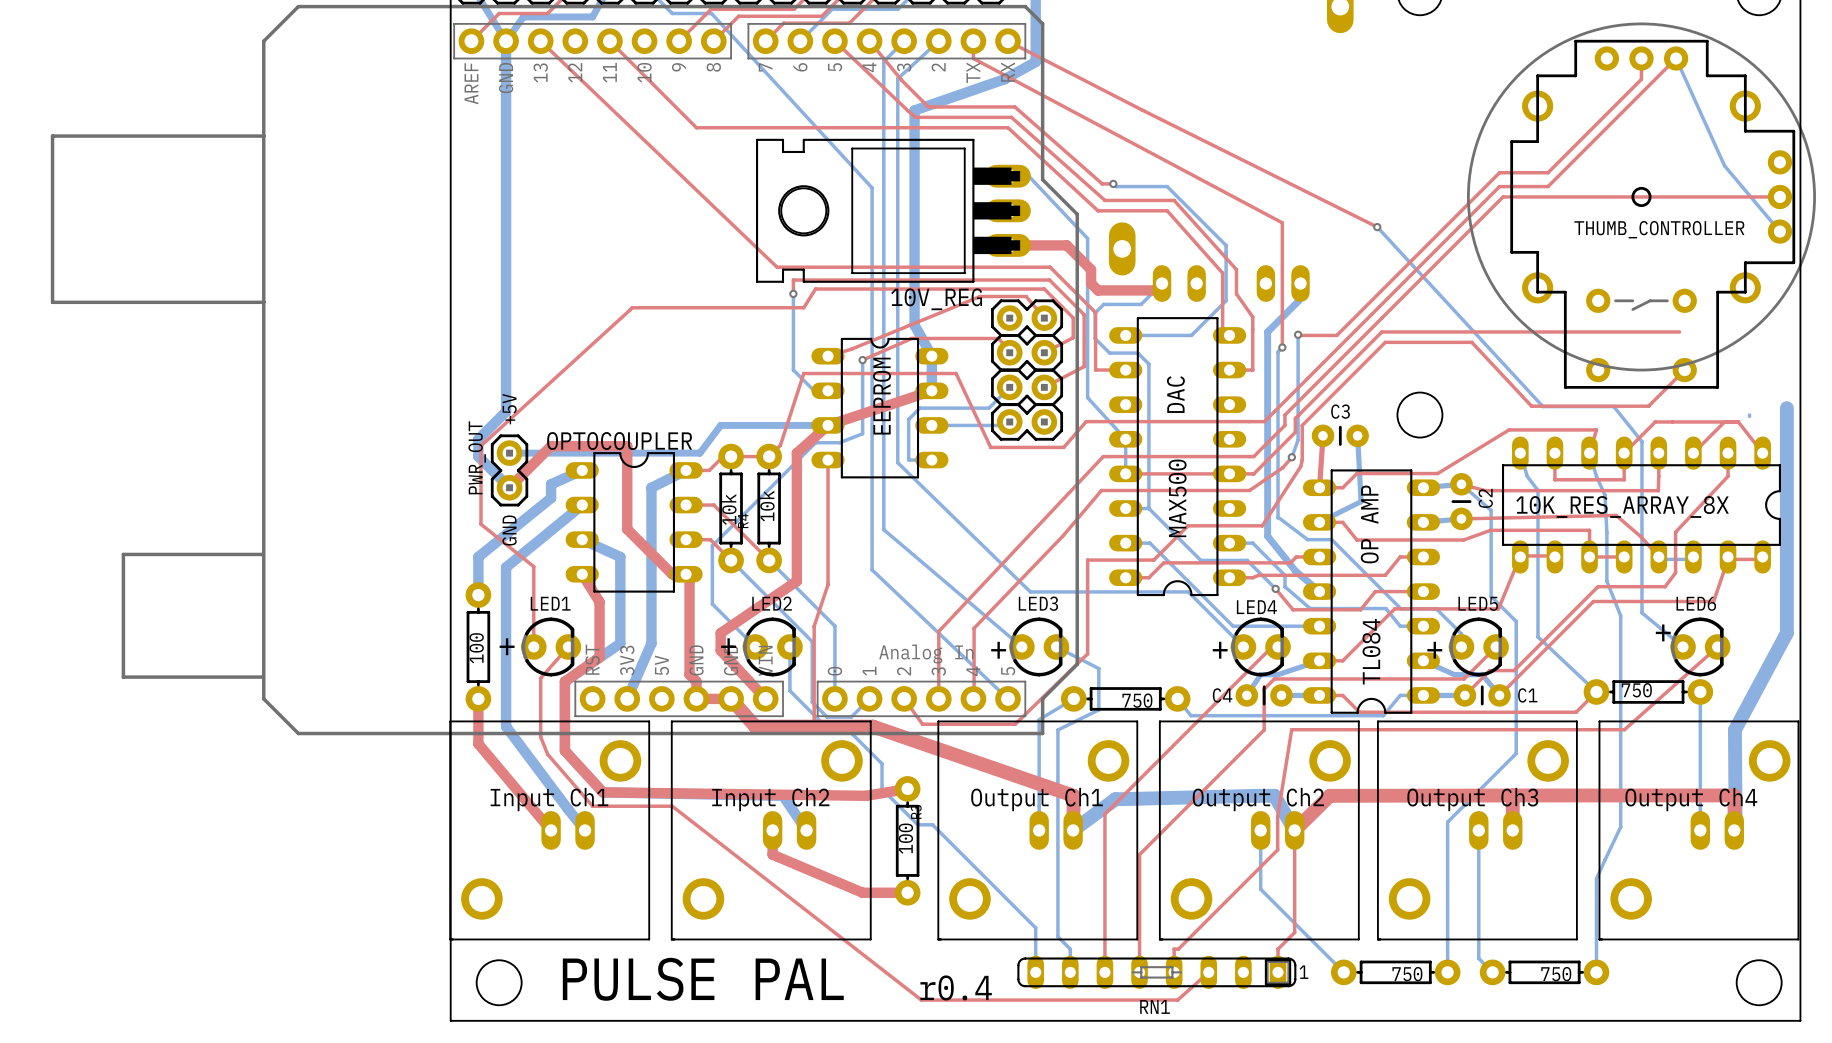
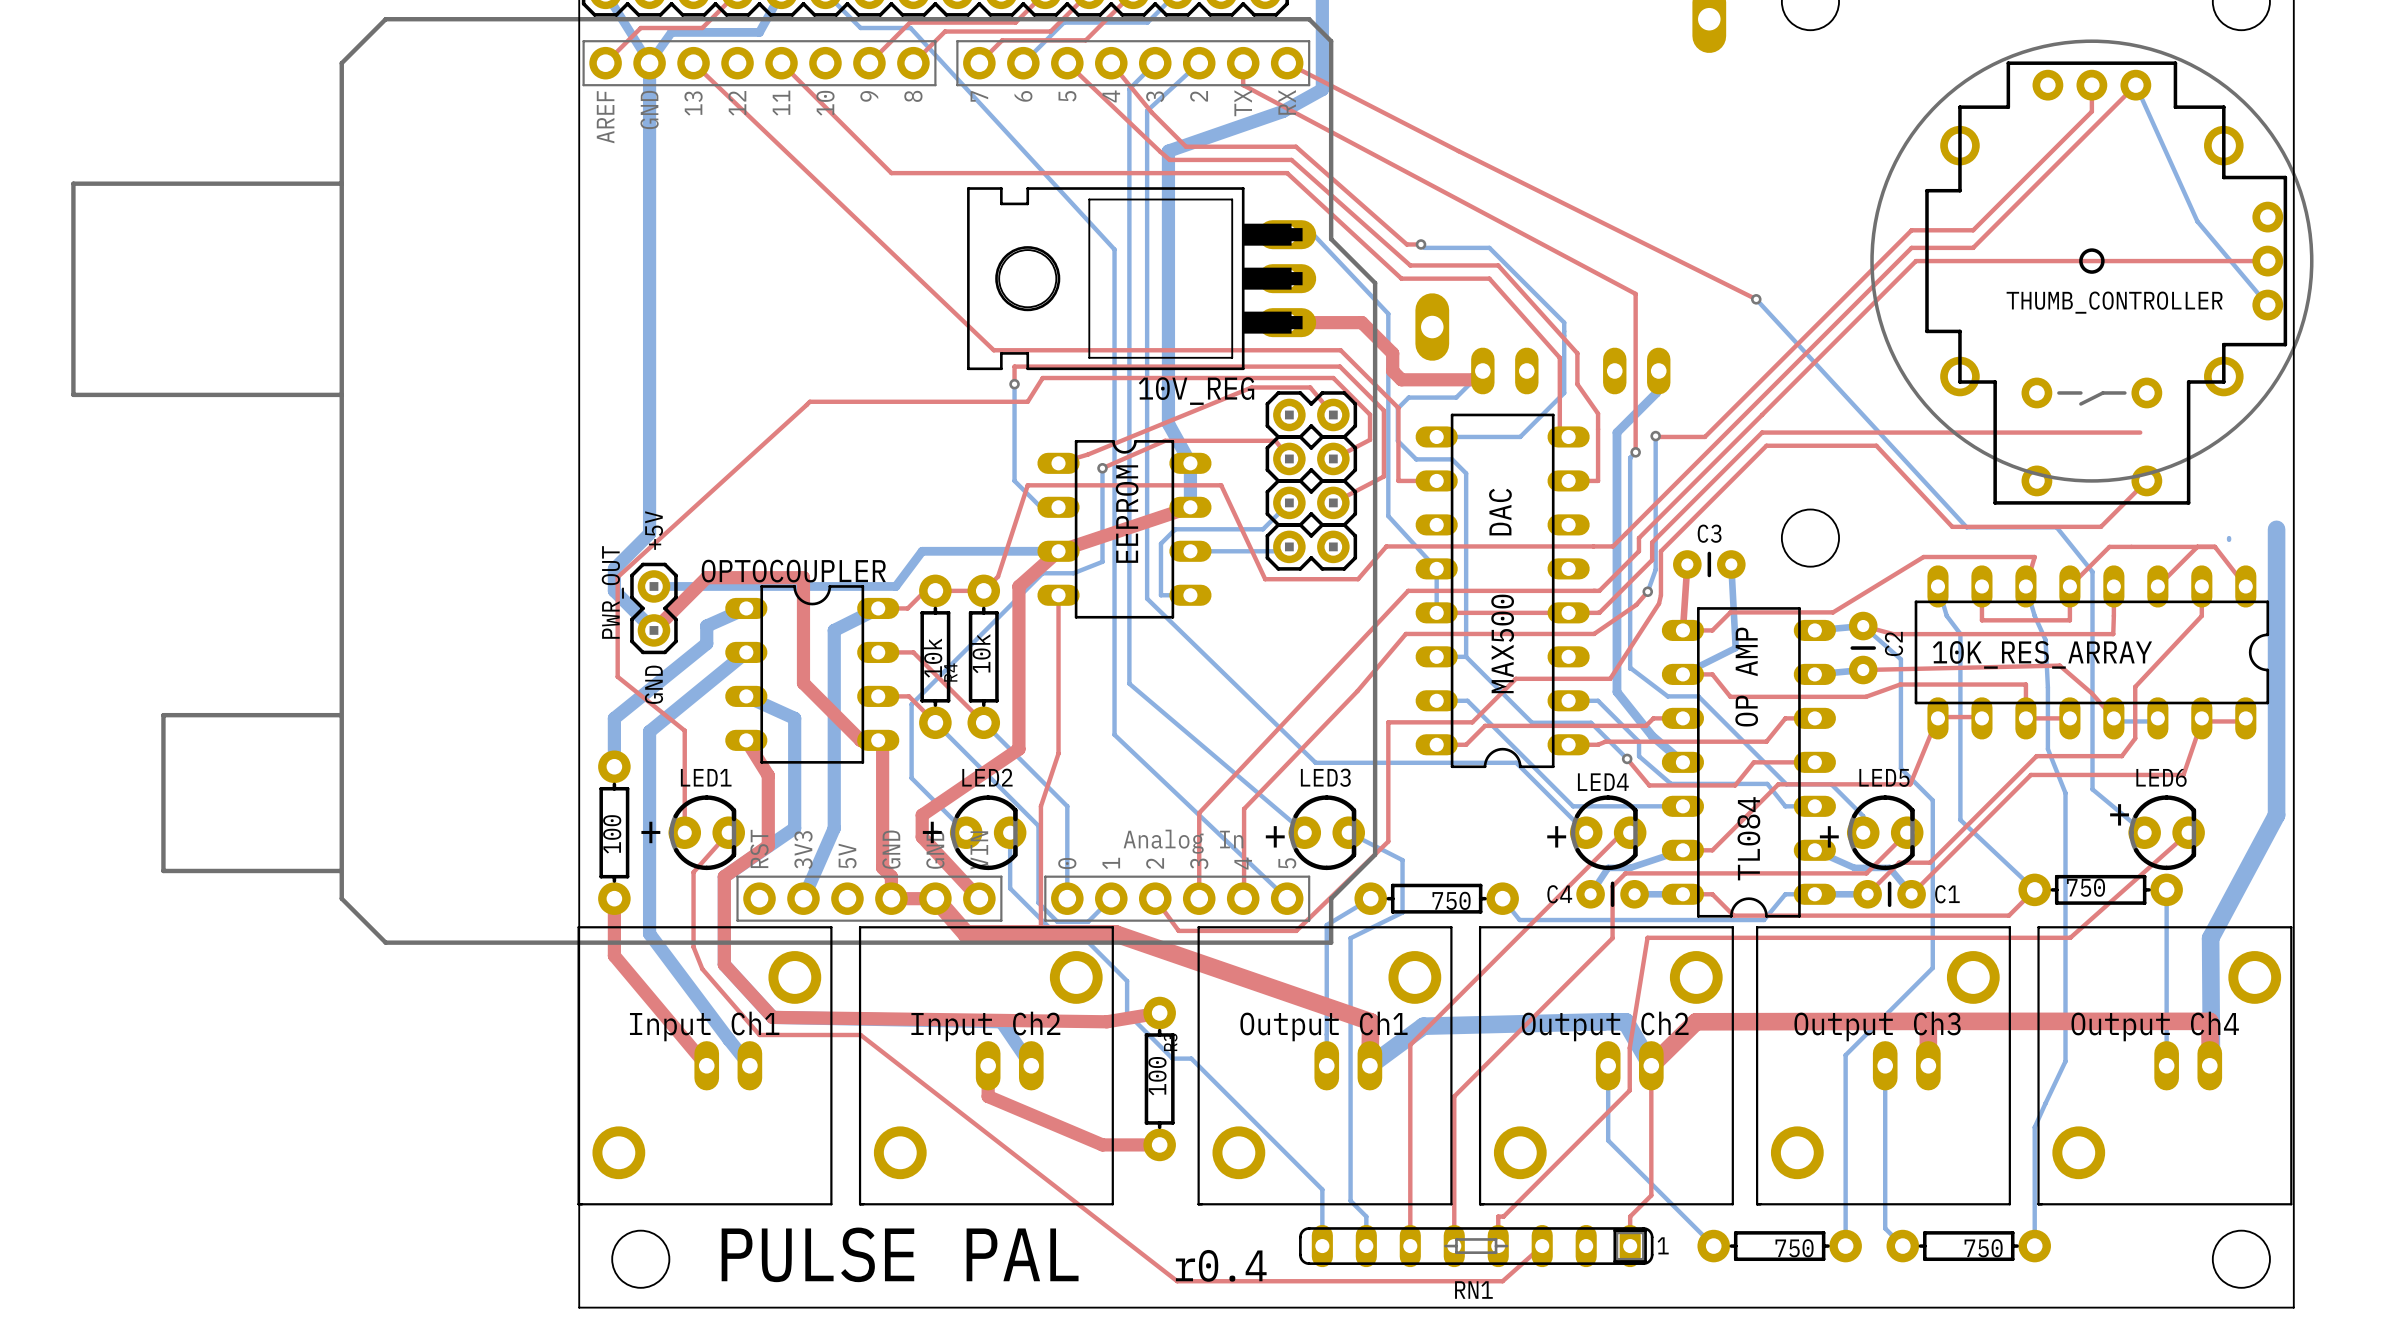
10K_RES_ARRAY_8X name: 10K_RES_ARRAY_8X (1622, 507) -> 10K_RES_ARRAY (2042, 654)

